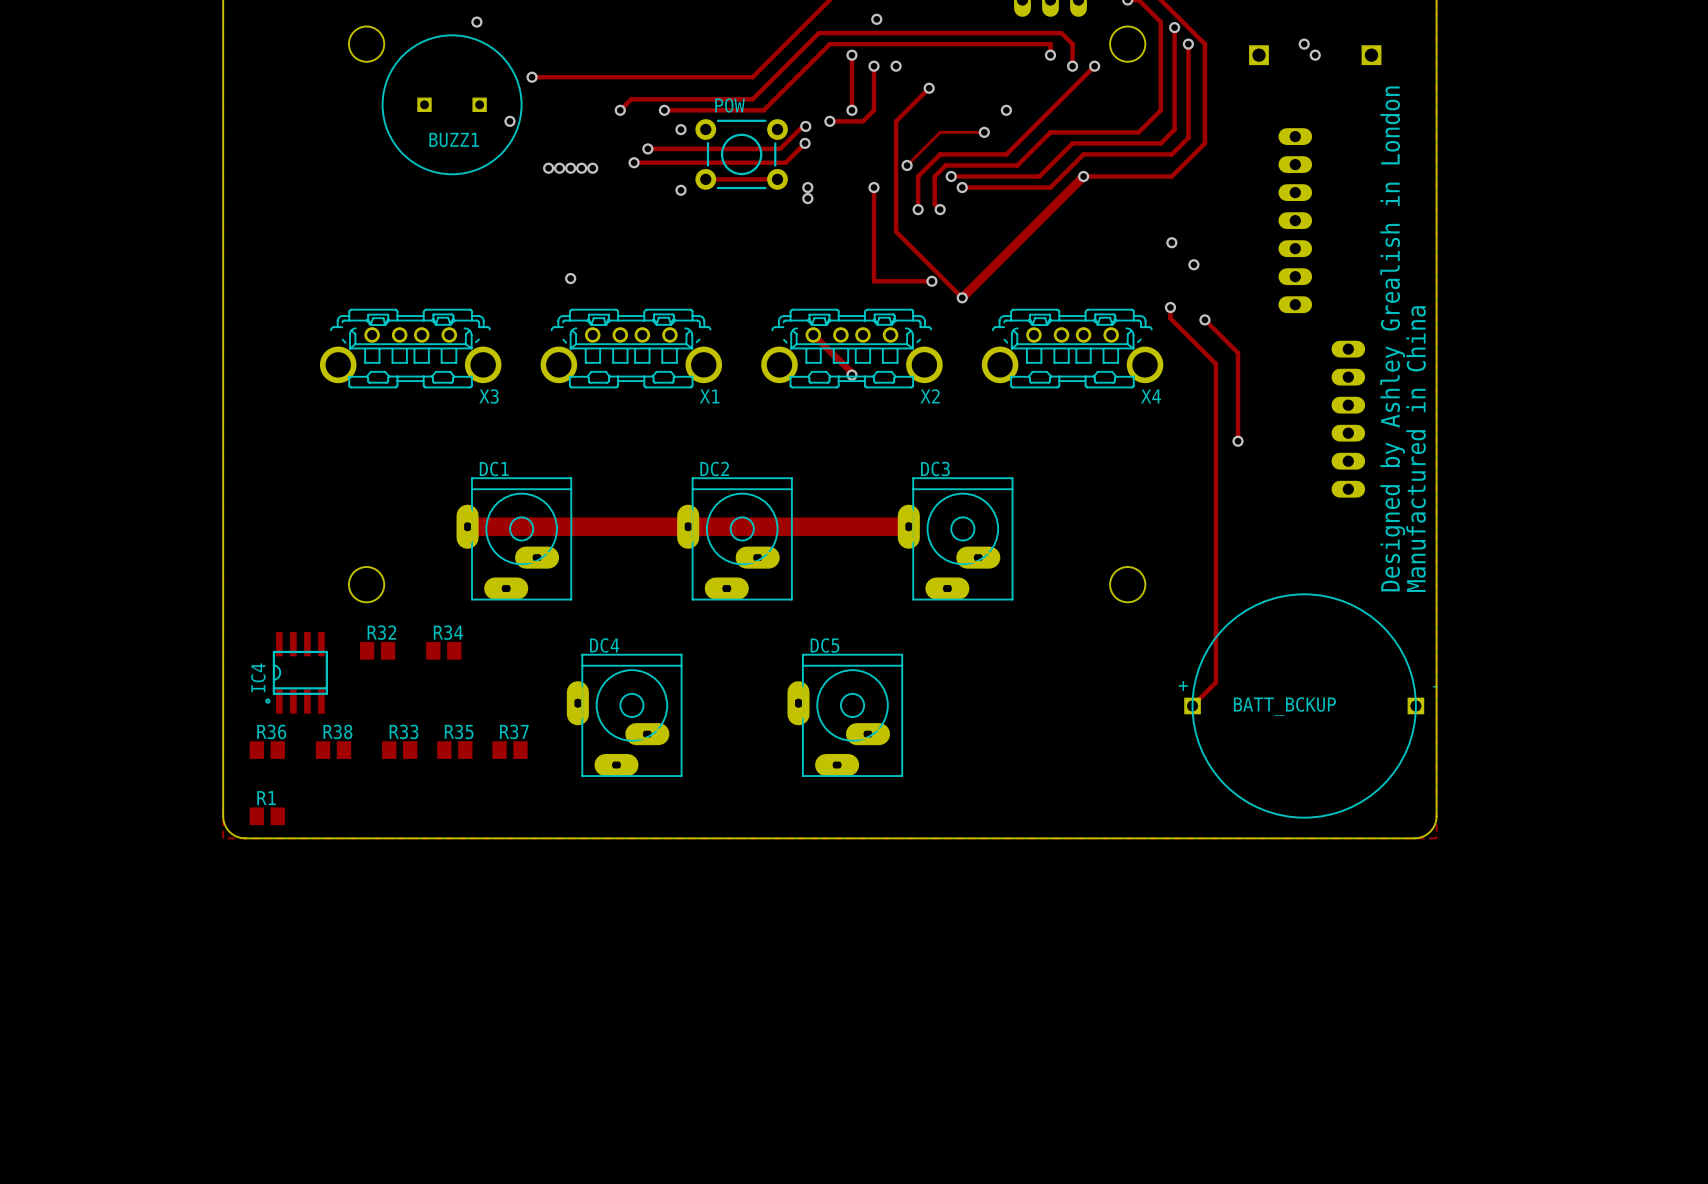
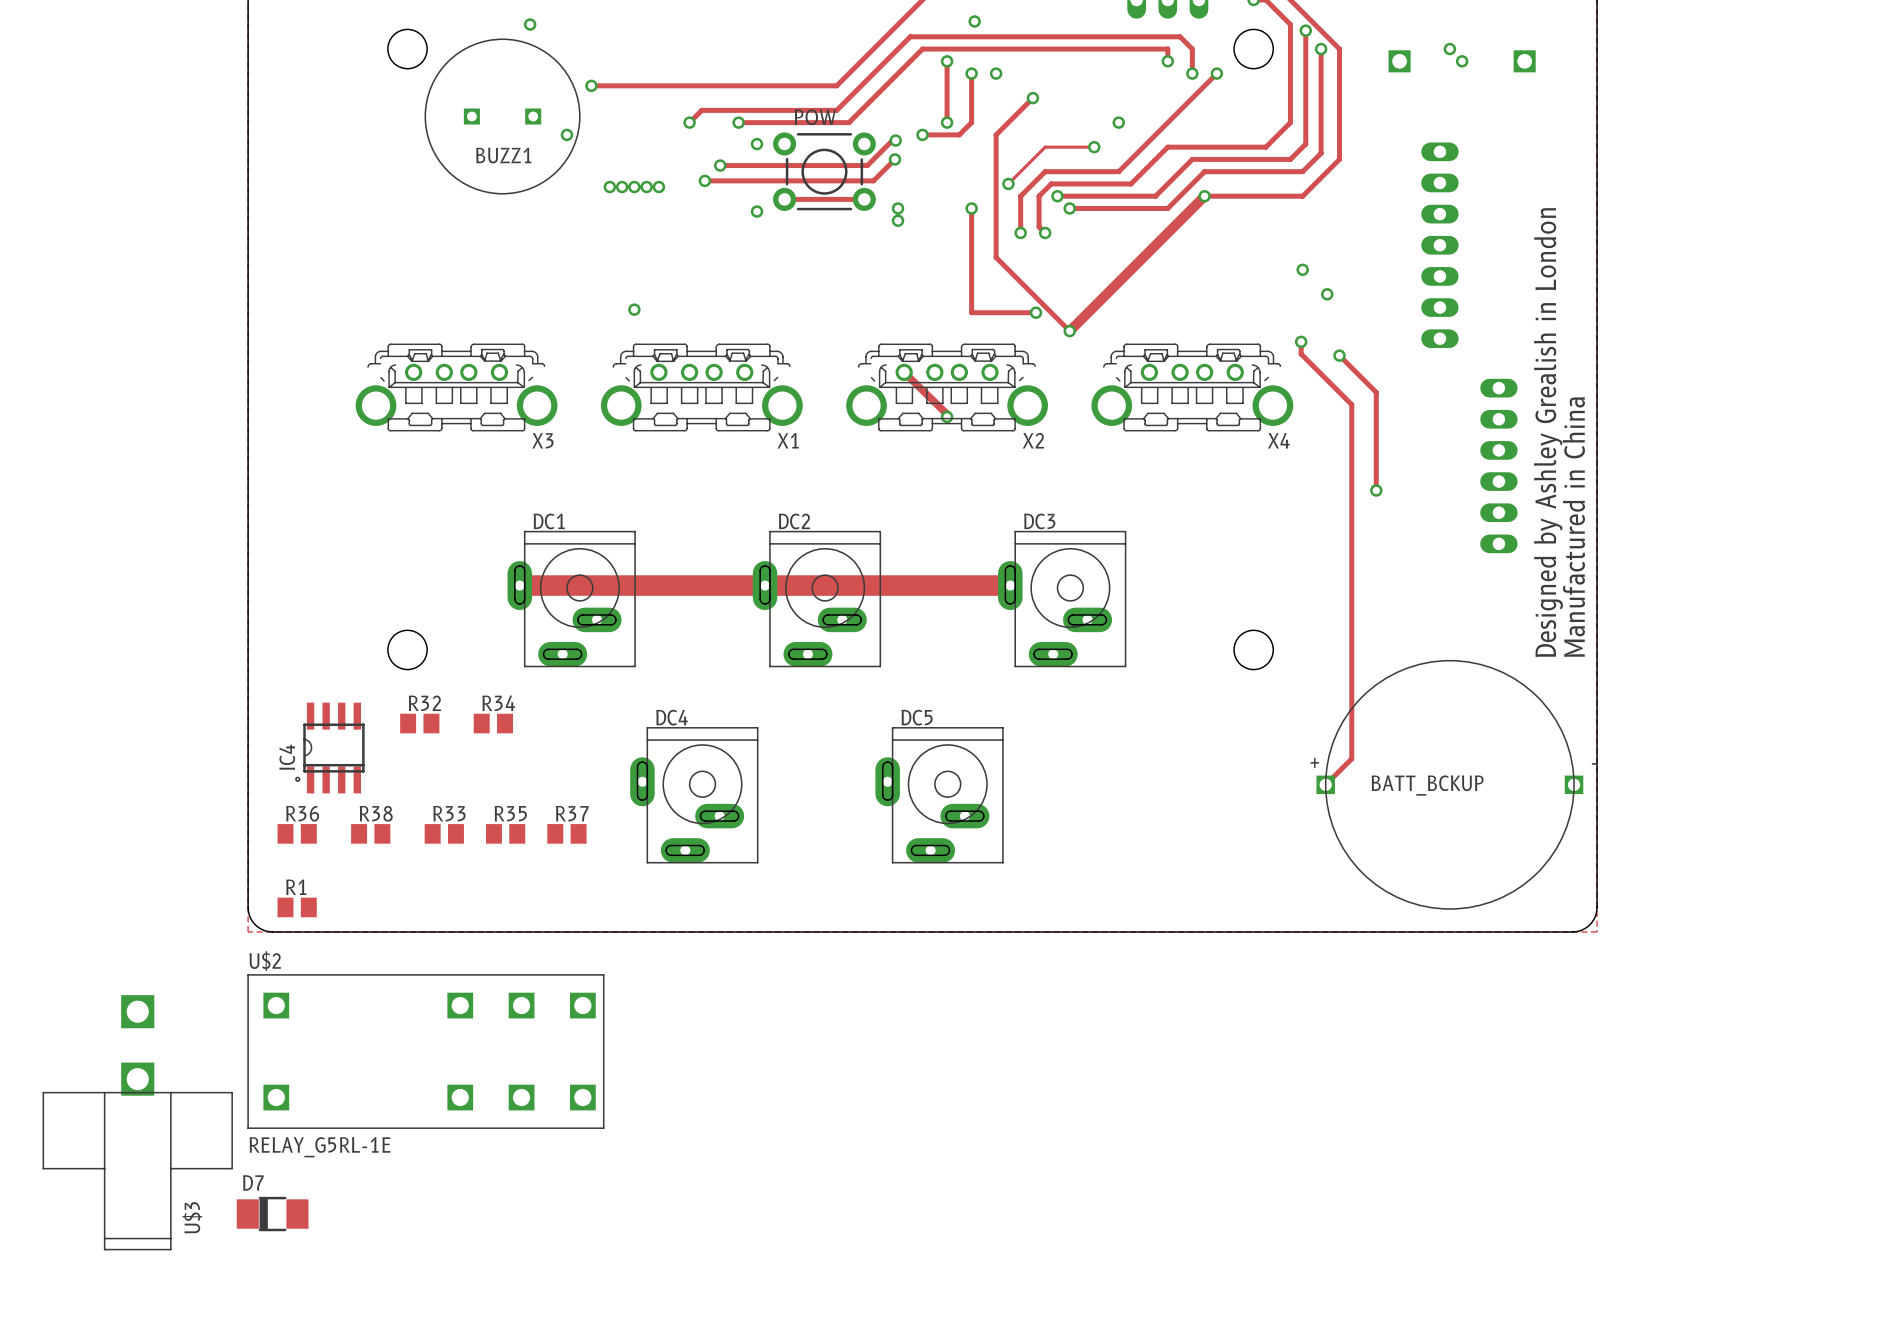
U$2: none -> RELAY_G5RL-1E (425, 1051)
U$3: none -> (137, 1122)
D7: none -> (272, 1214)

